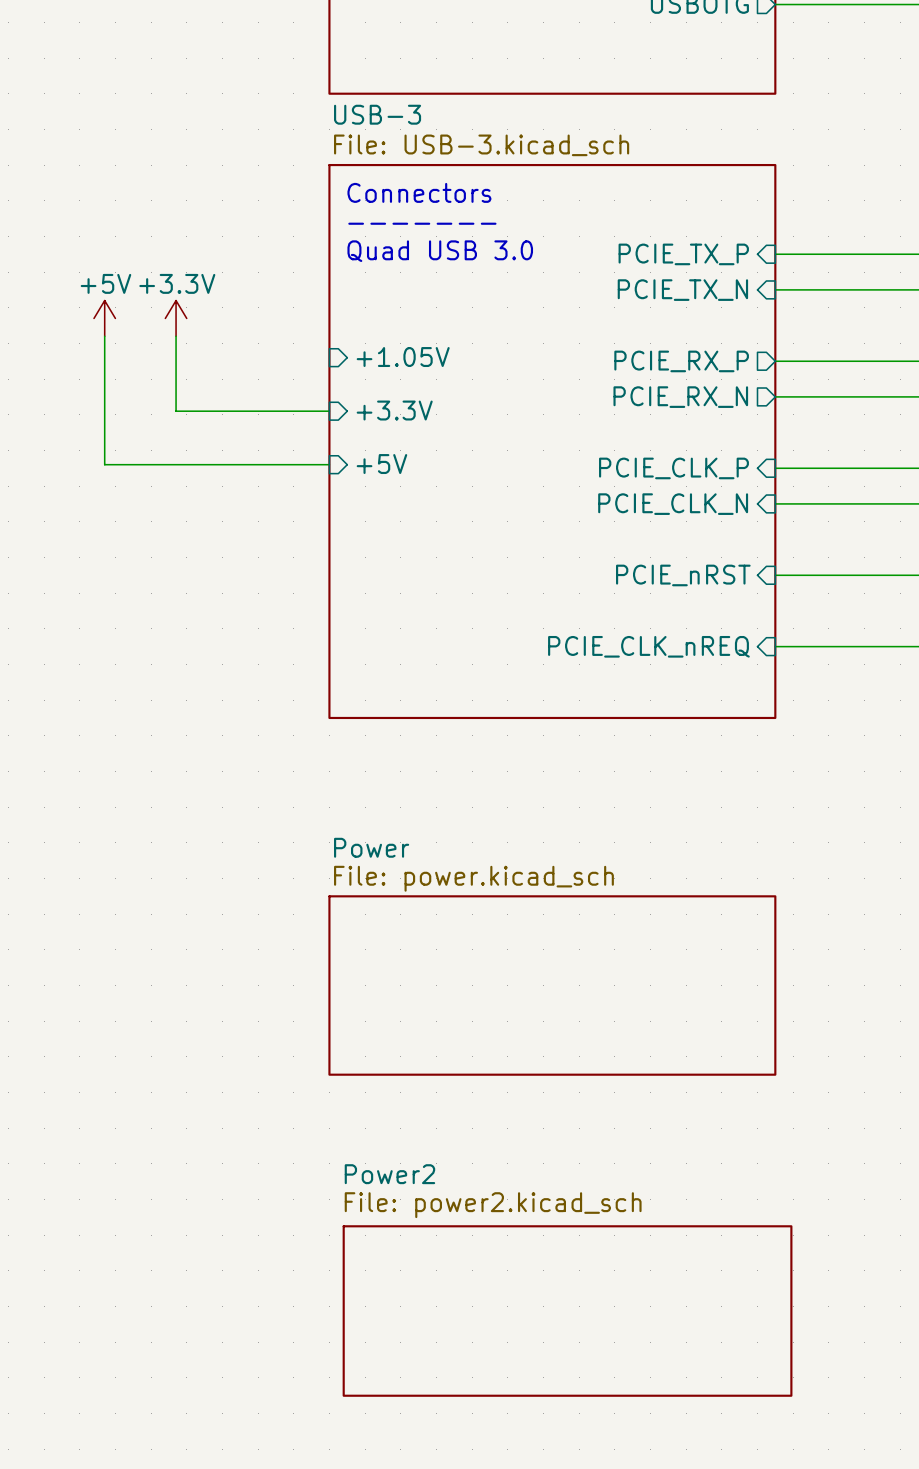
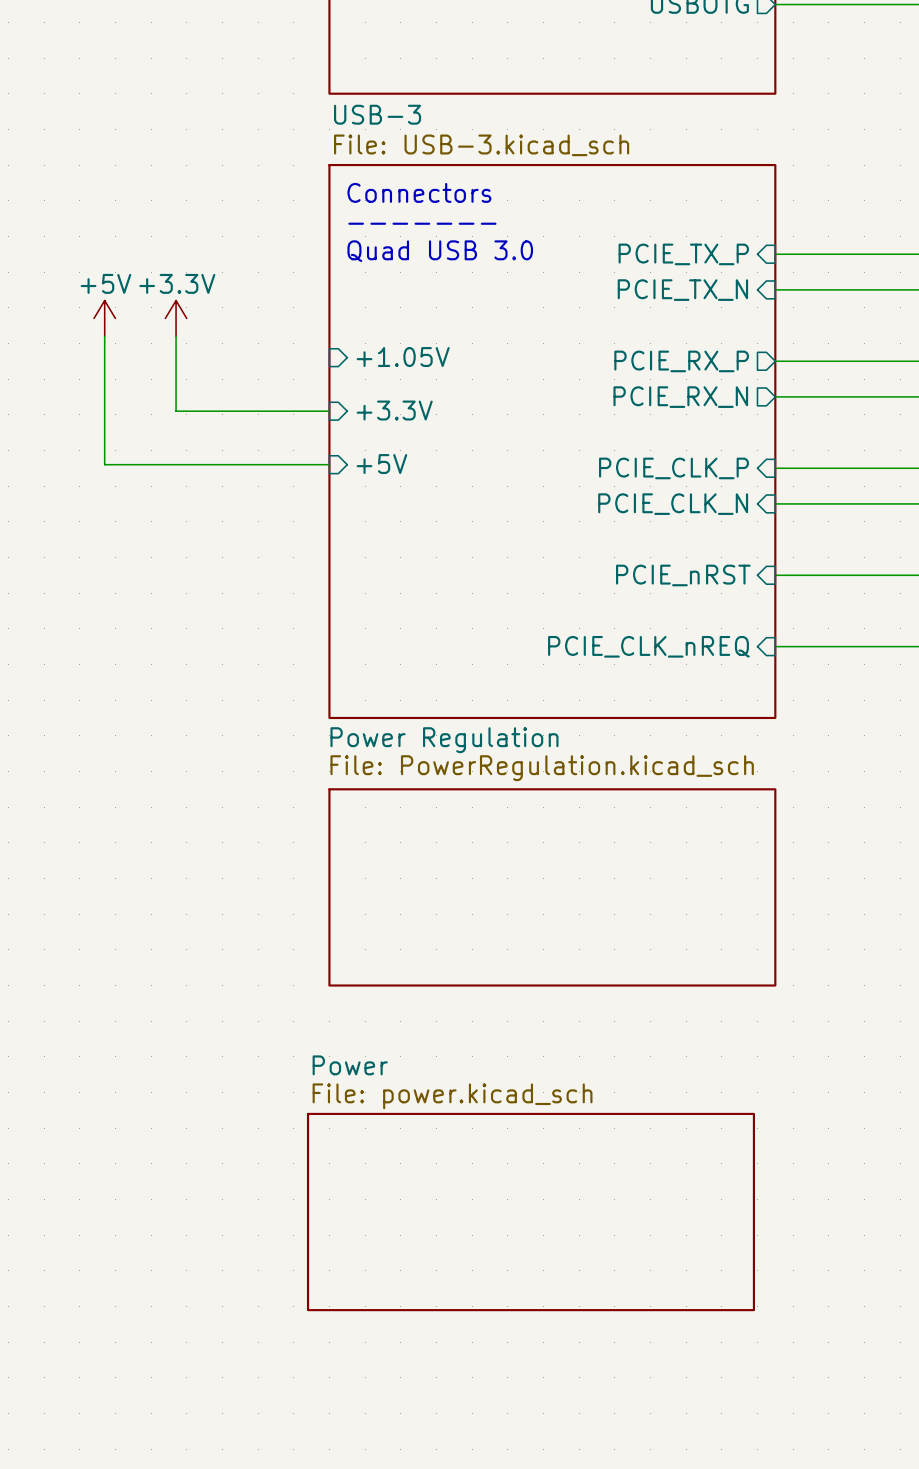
sheet Power Regulation: none -> File: PowerRegulation.kicad_sch (552, 887)
sheet Power: File: power.kicad_sch (552, 985) -> none
sheet Power: none -> File: power.kicad_sch (530, 1212)
sheet Power2: File: power2.kicad_sch (567, 1311) -> none

